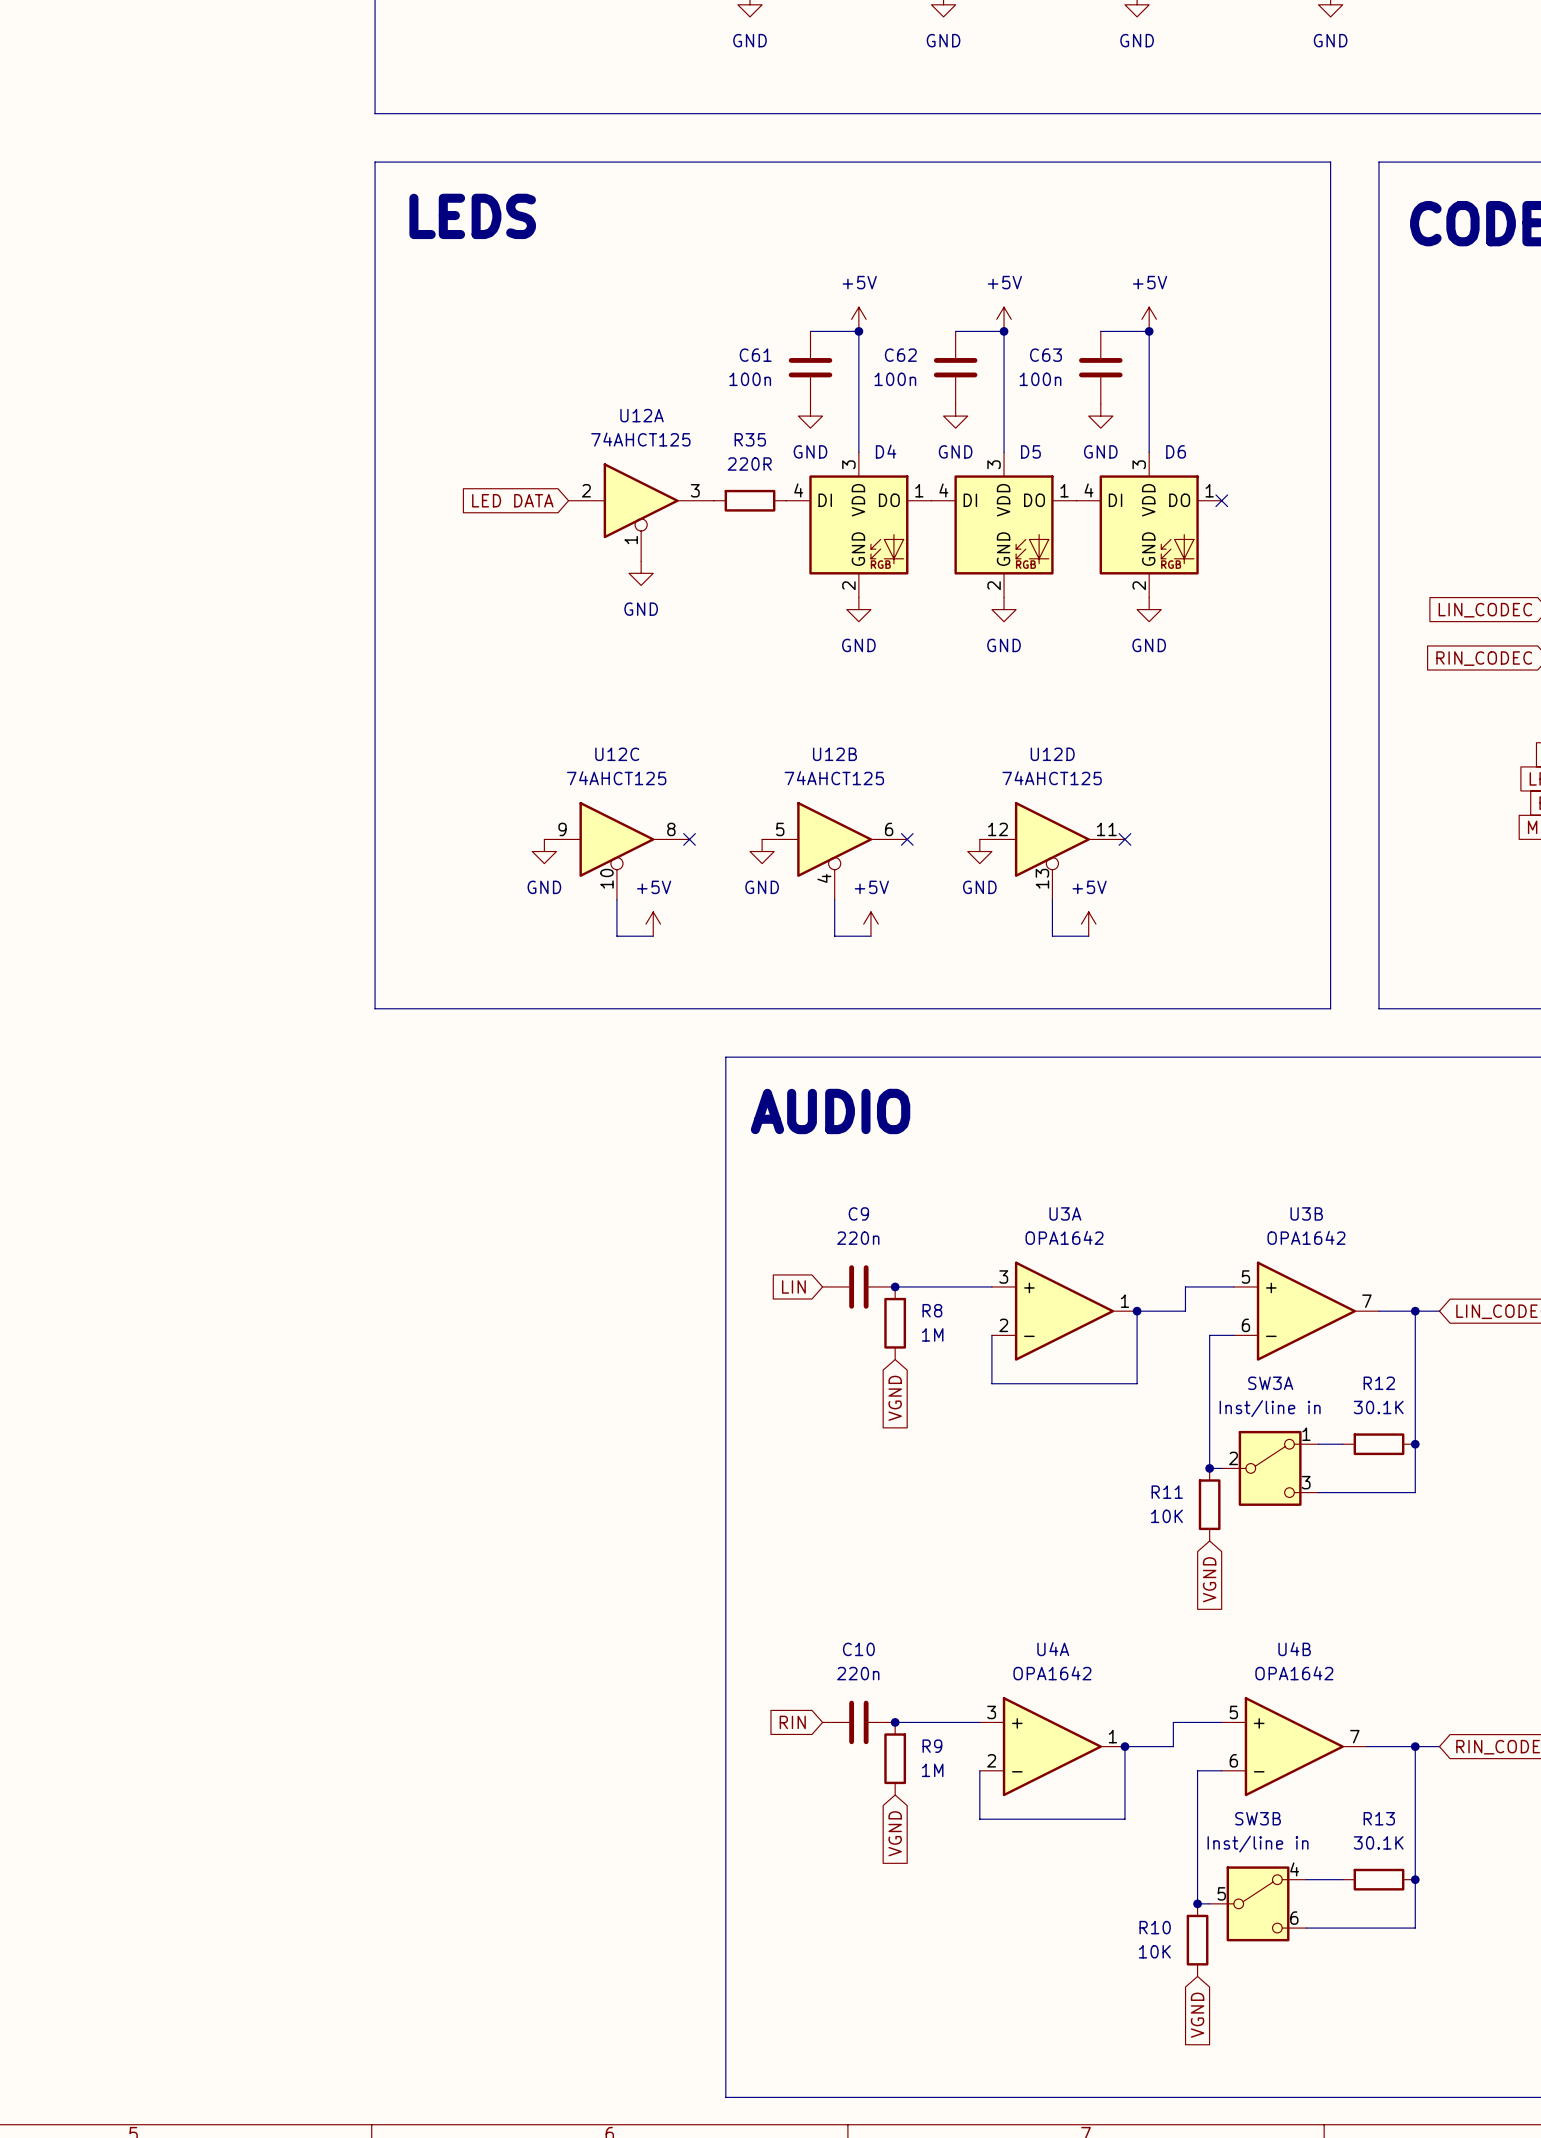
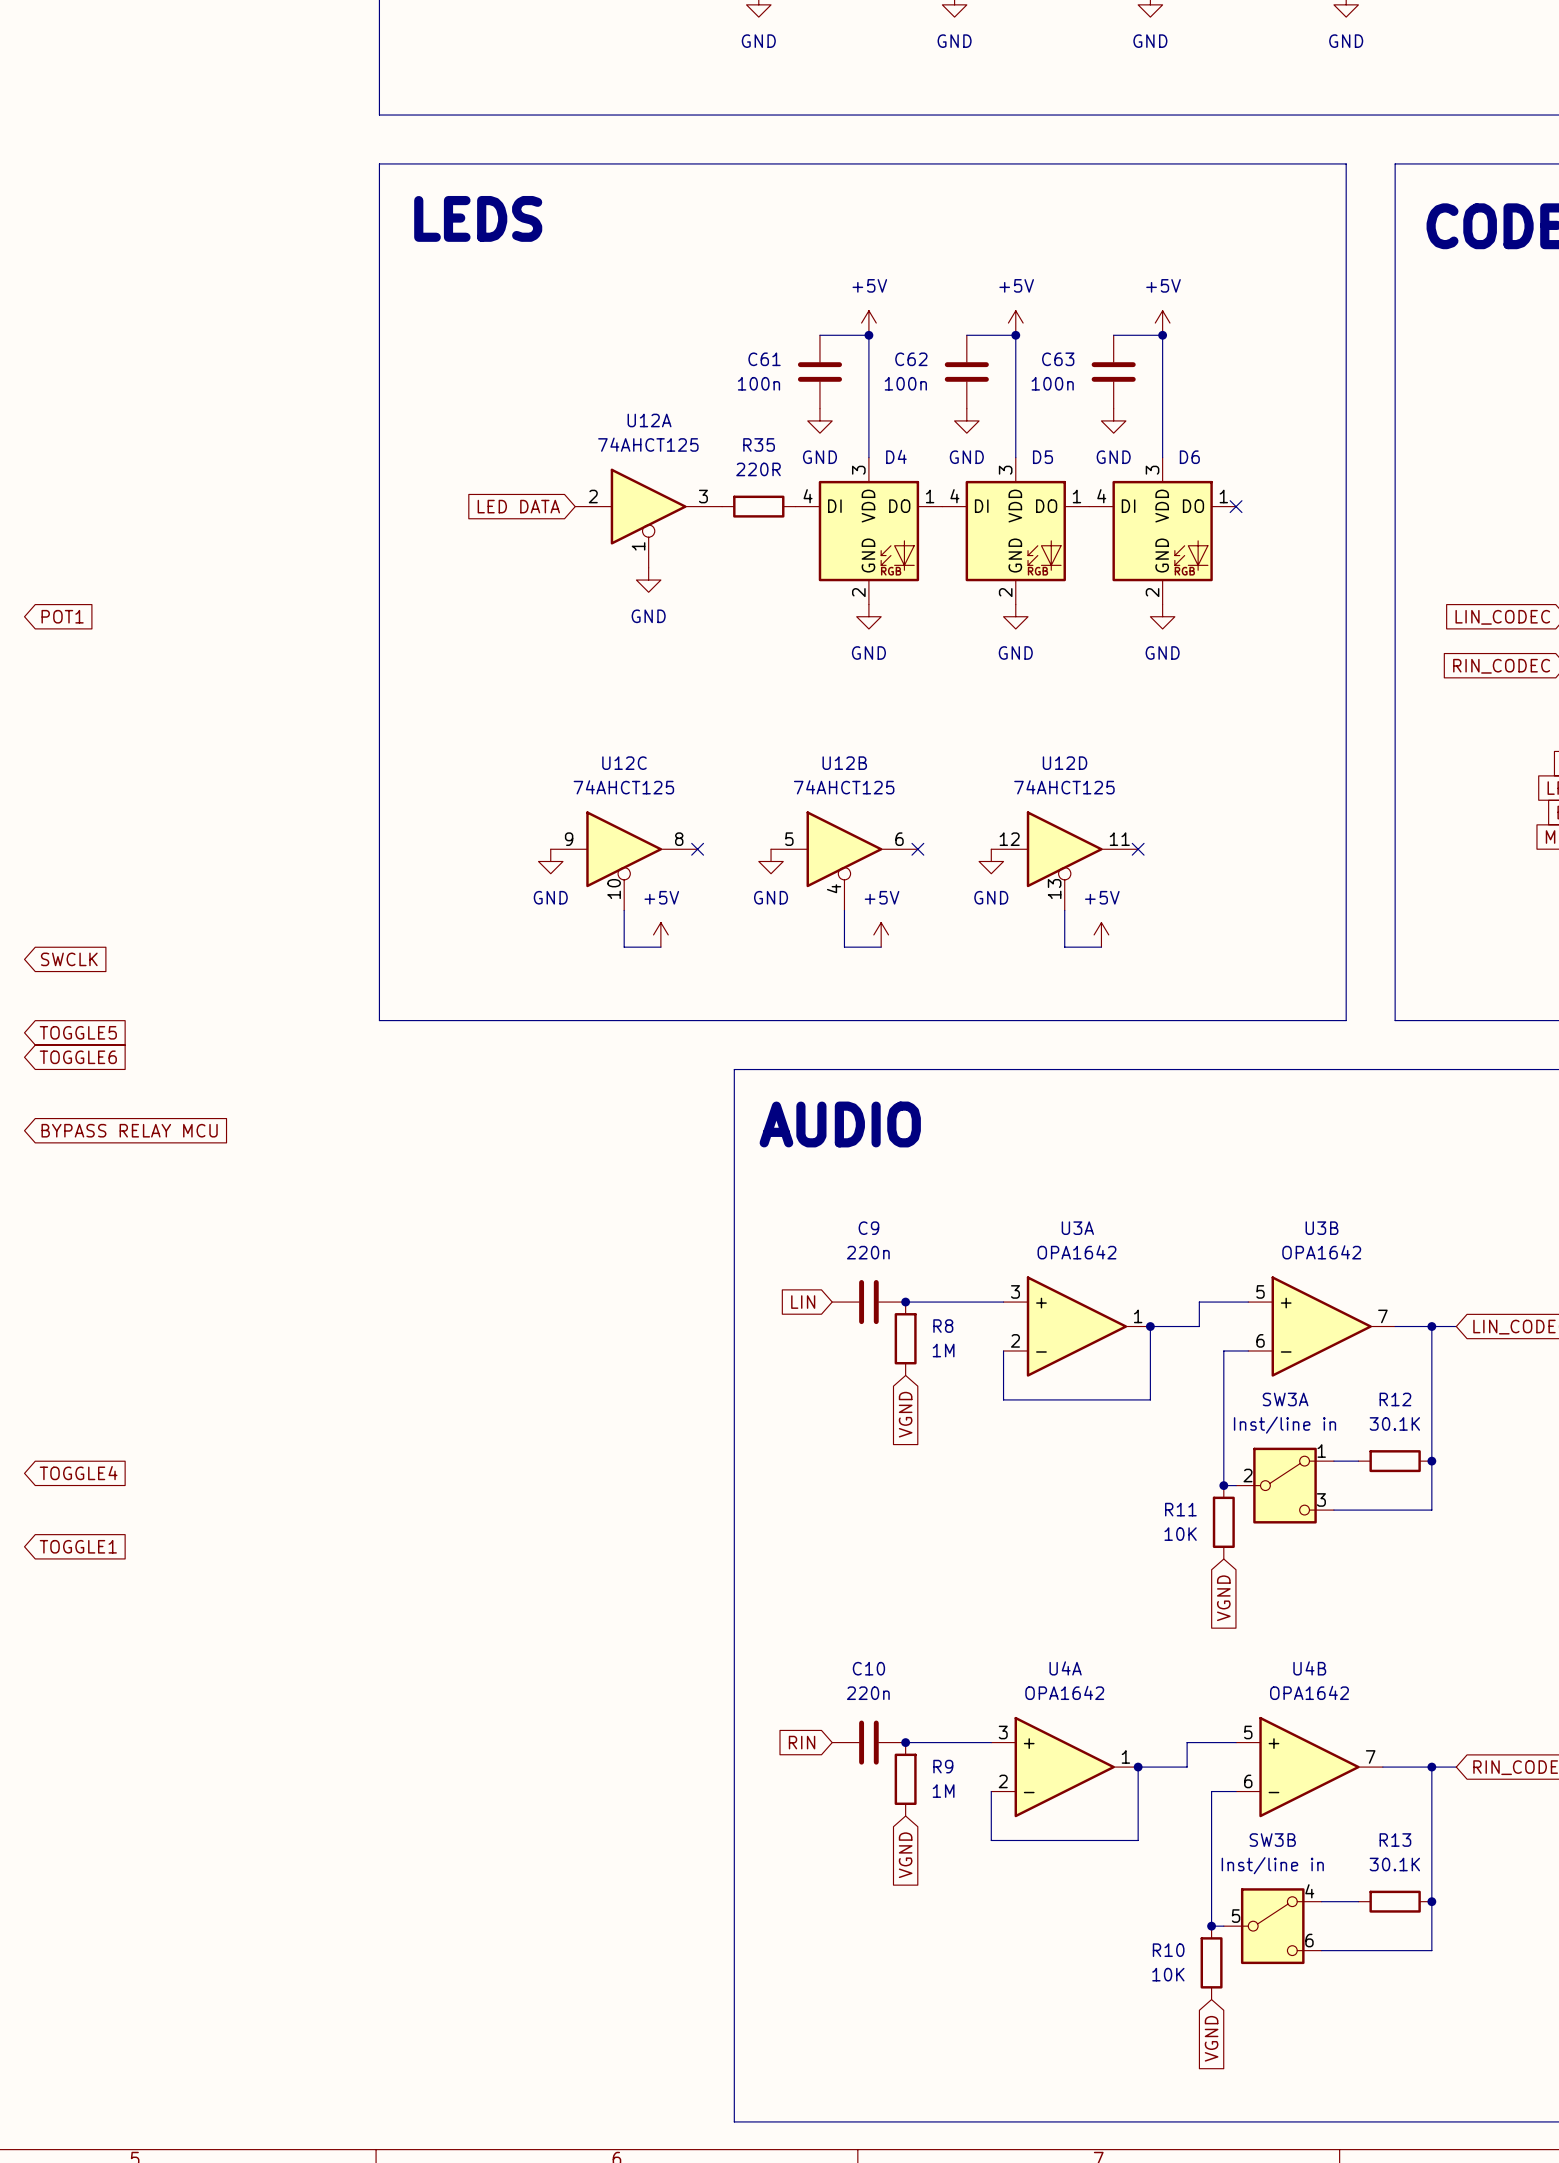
global label: none -> POT1 (62, 616)
global label: none -> SWCLK (69, 959)
global label: none -> TOGGLE5 (78, 1032)
global label: none -> TOGGLE6 (78, 1057)
global label: none -> BYPASS RELAY MCU (129, 1130)
global label: none -> TOGGLE4 (78, 1473)
global label: none -> TOGGLE1 (78, 1546)

